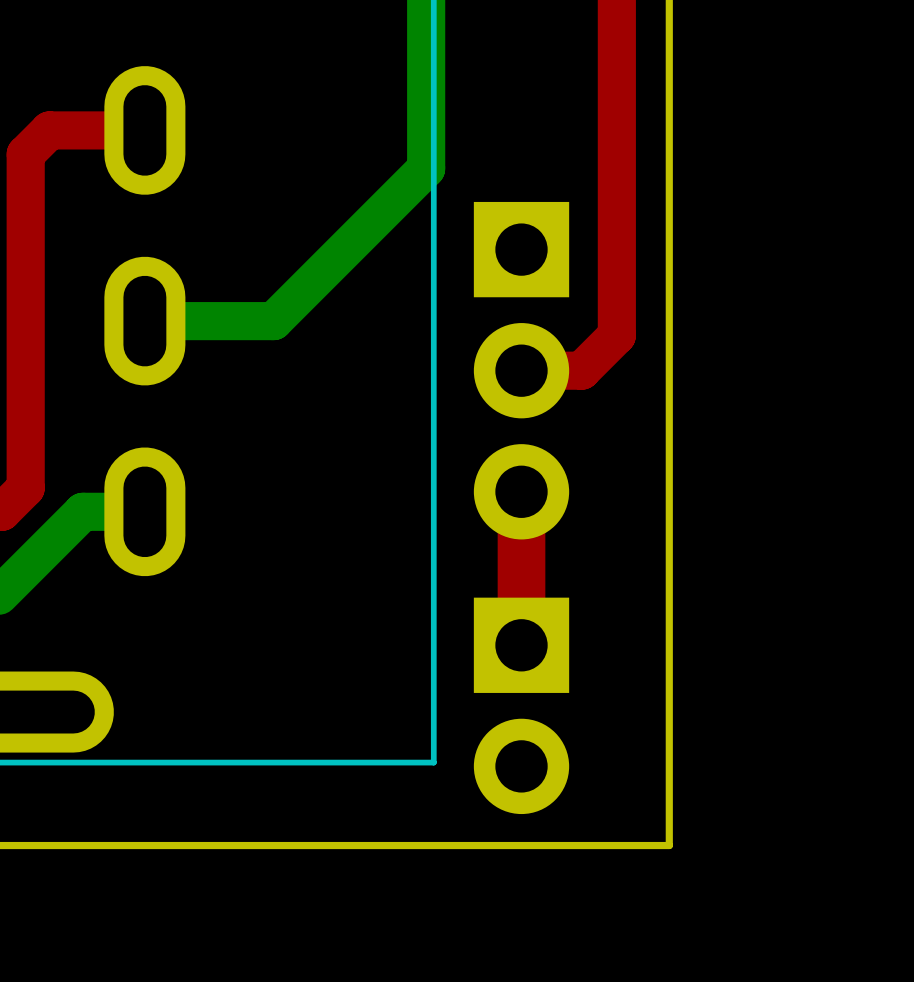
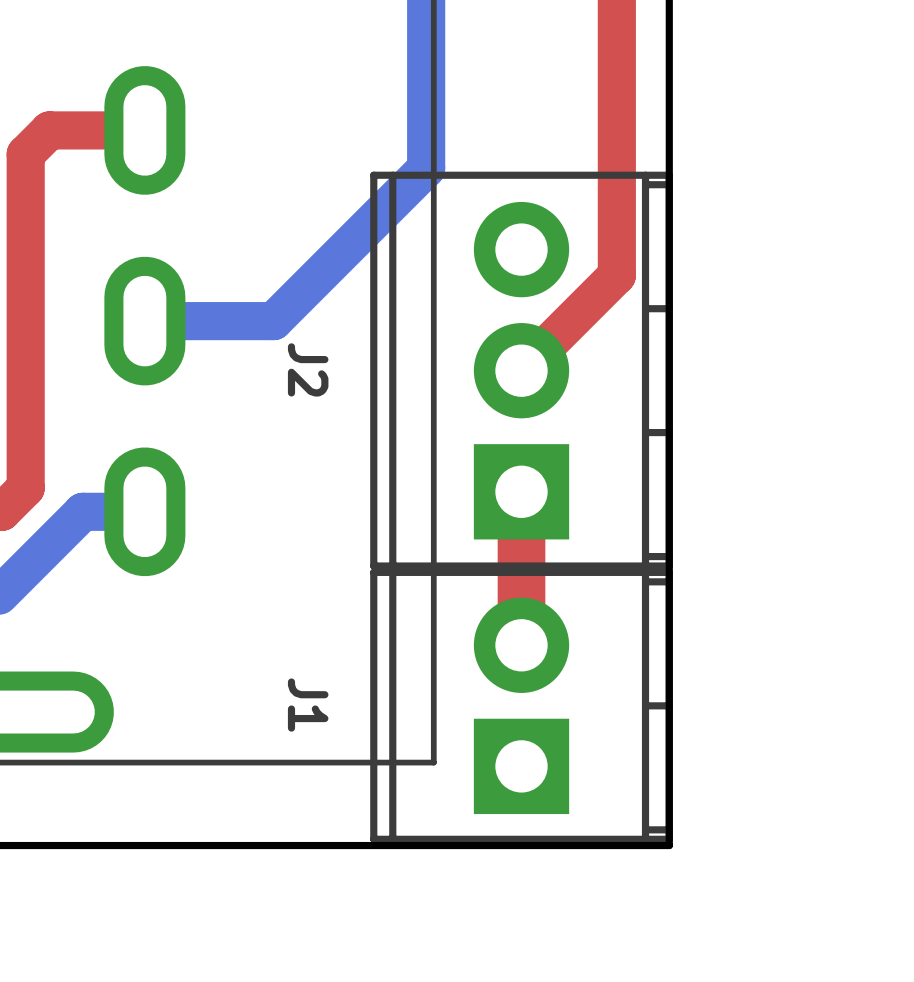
top track: (616, 275) (616, 335) (581, 370) (521, 370) -> (616, 275) (521, 370)
J2 side: top (521, 370) -> bottom (521, 370)
J1 side: top (521, 705) -> bottom (521, 705)

